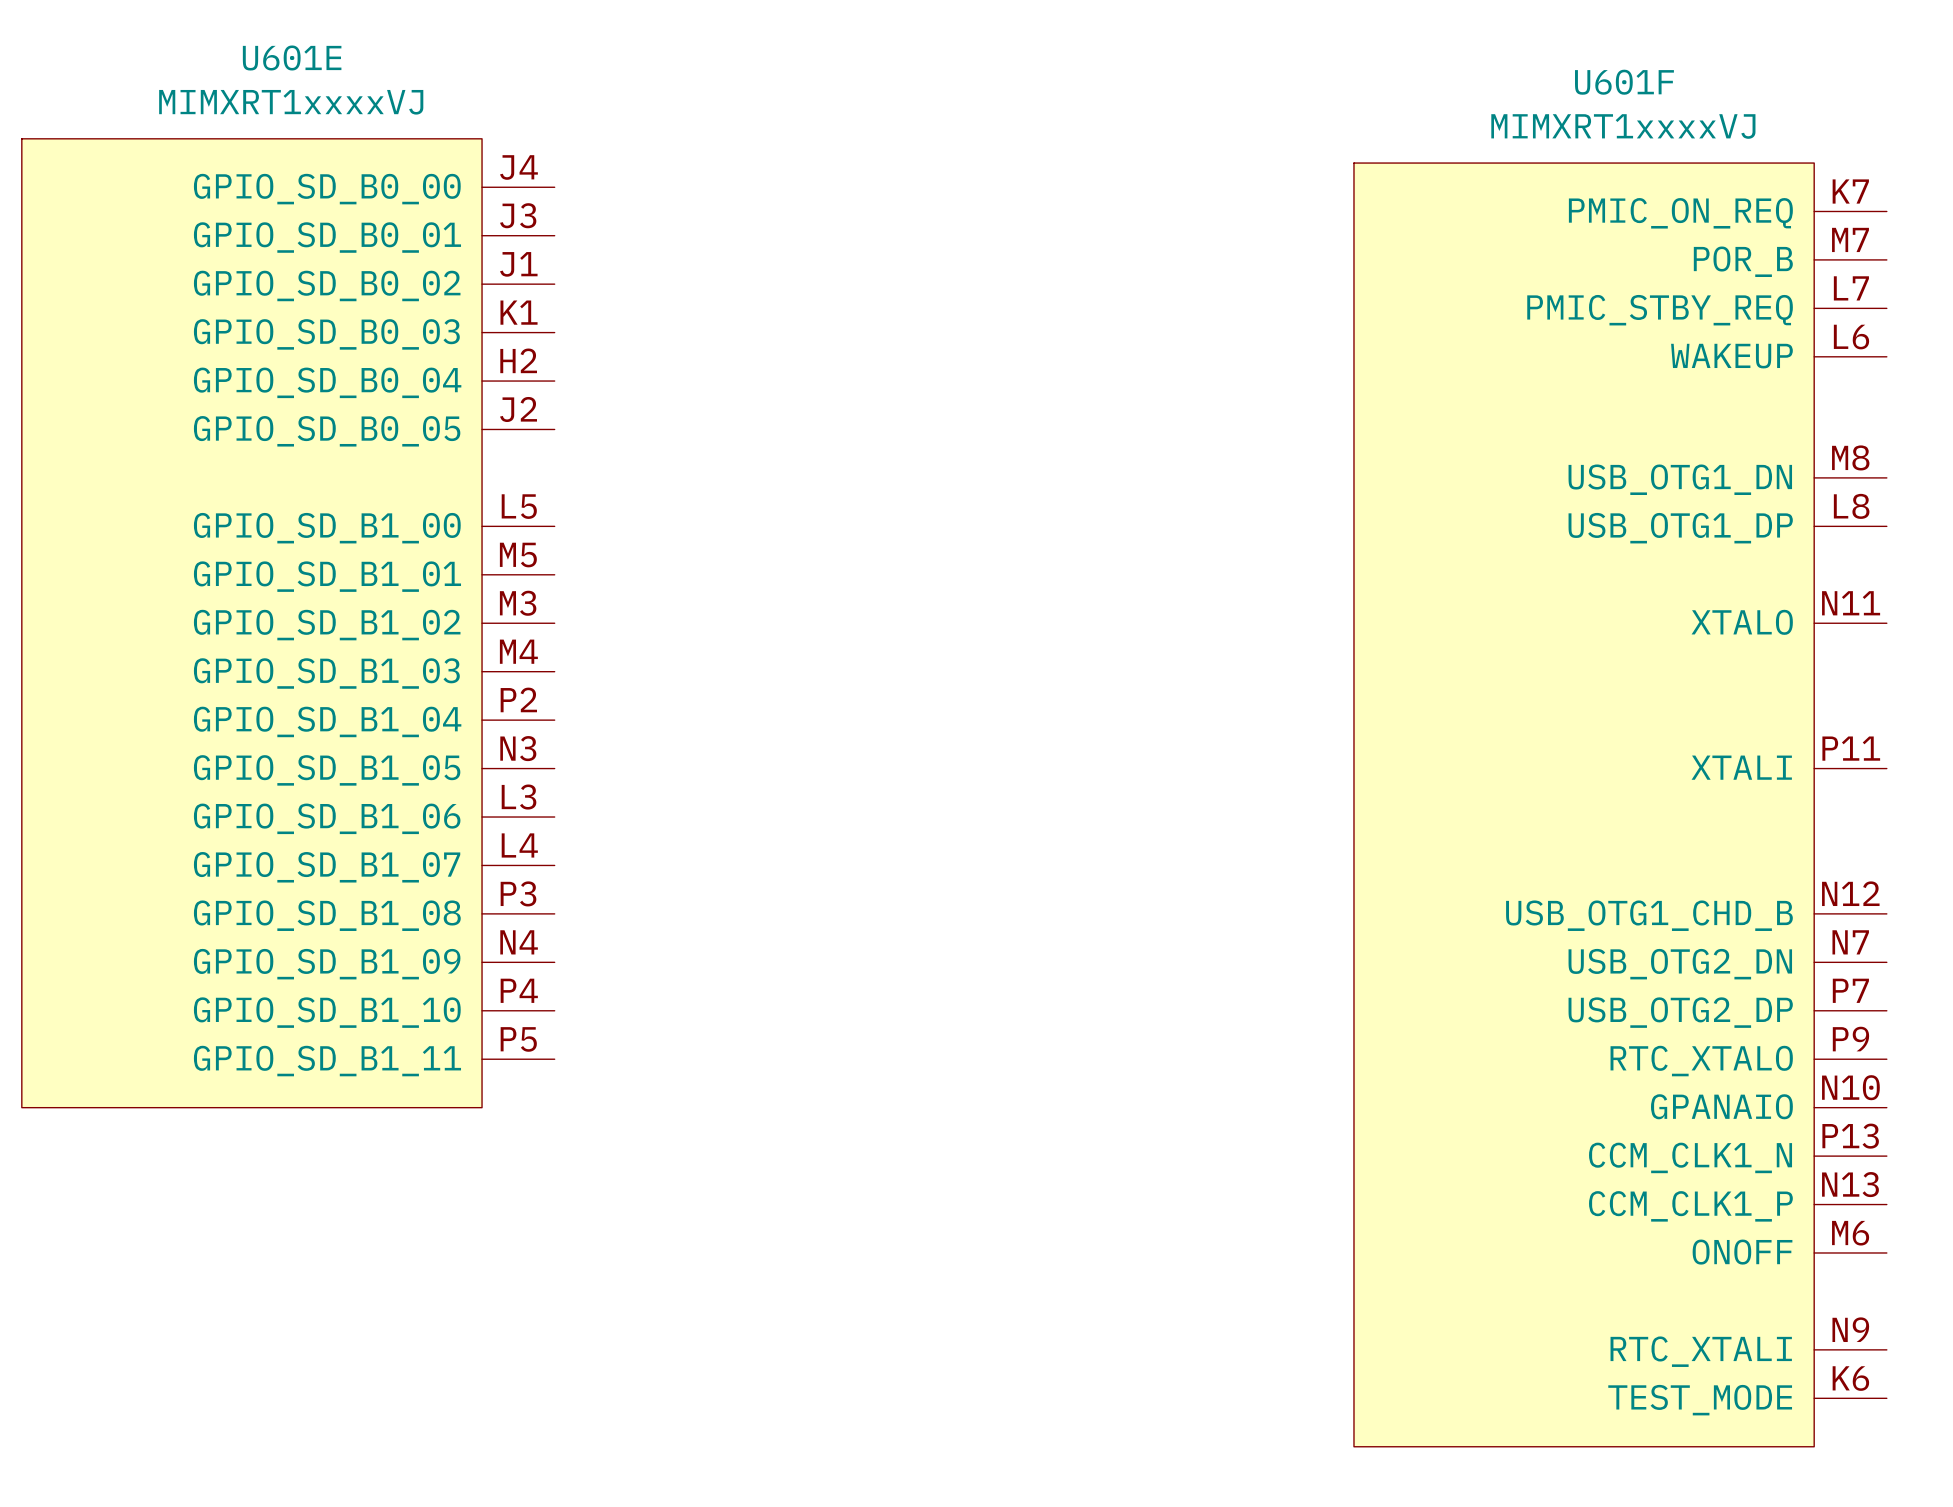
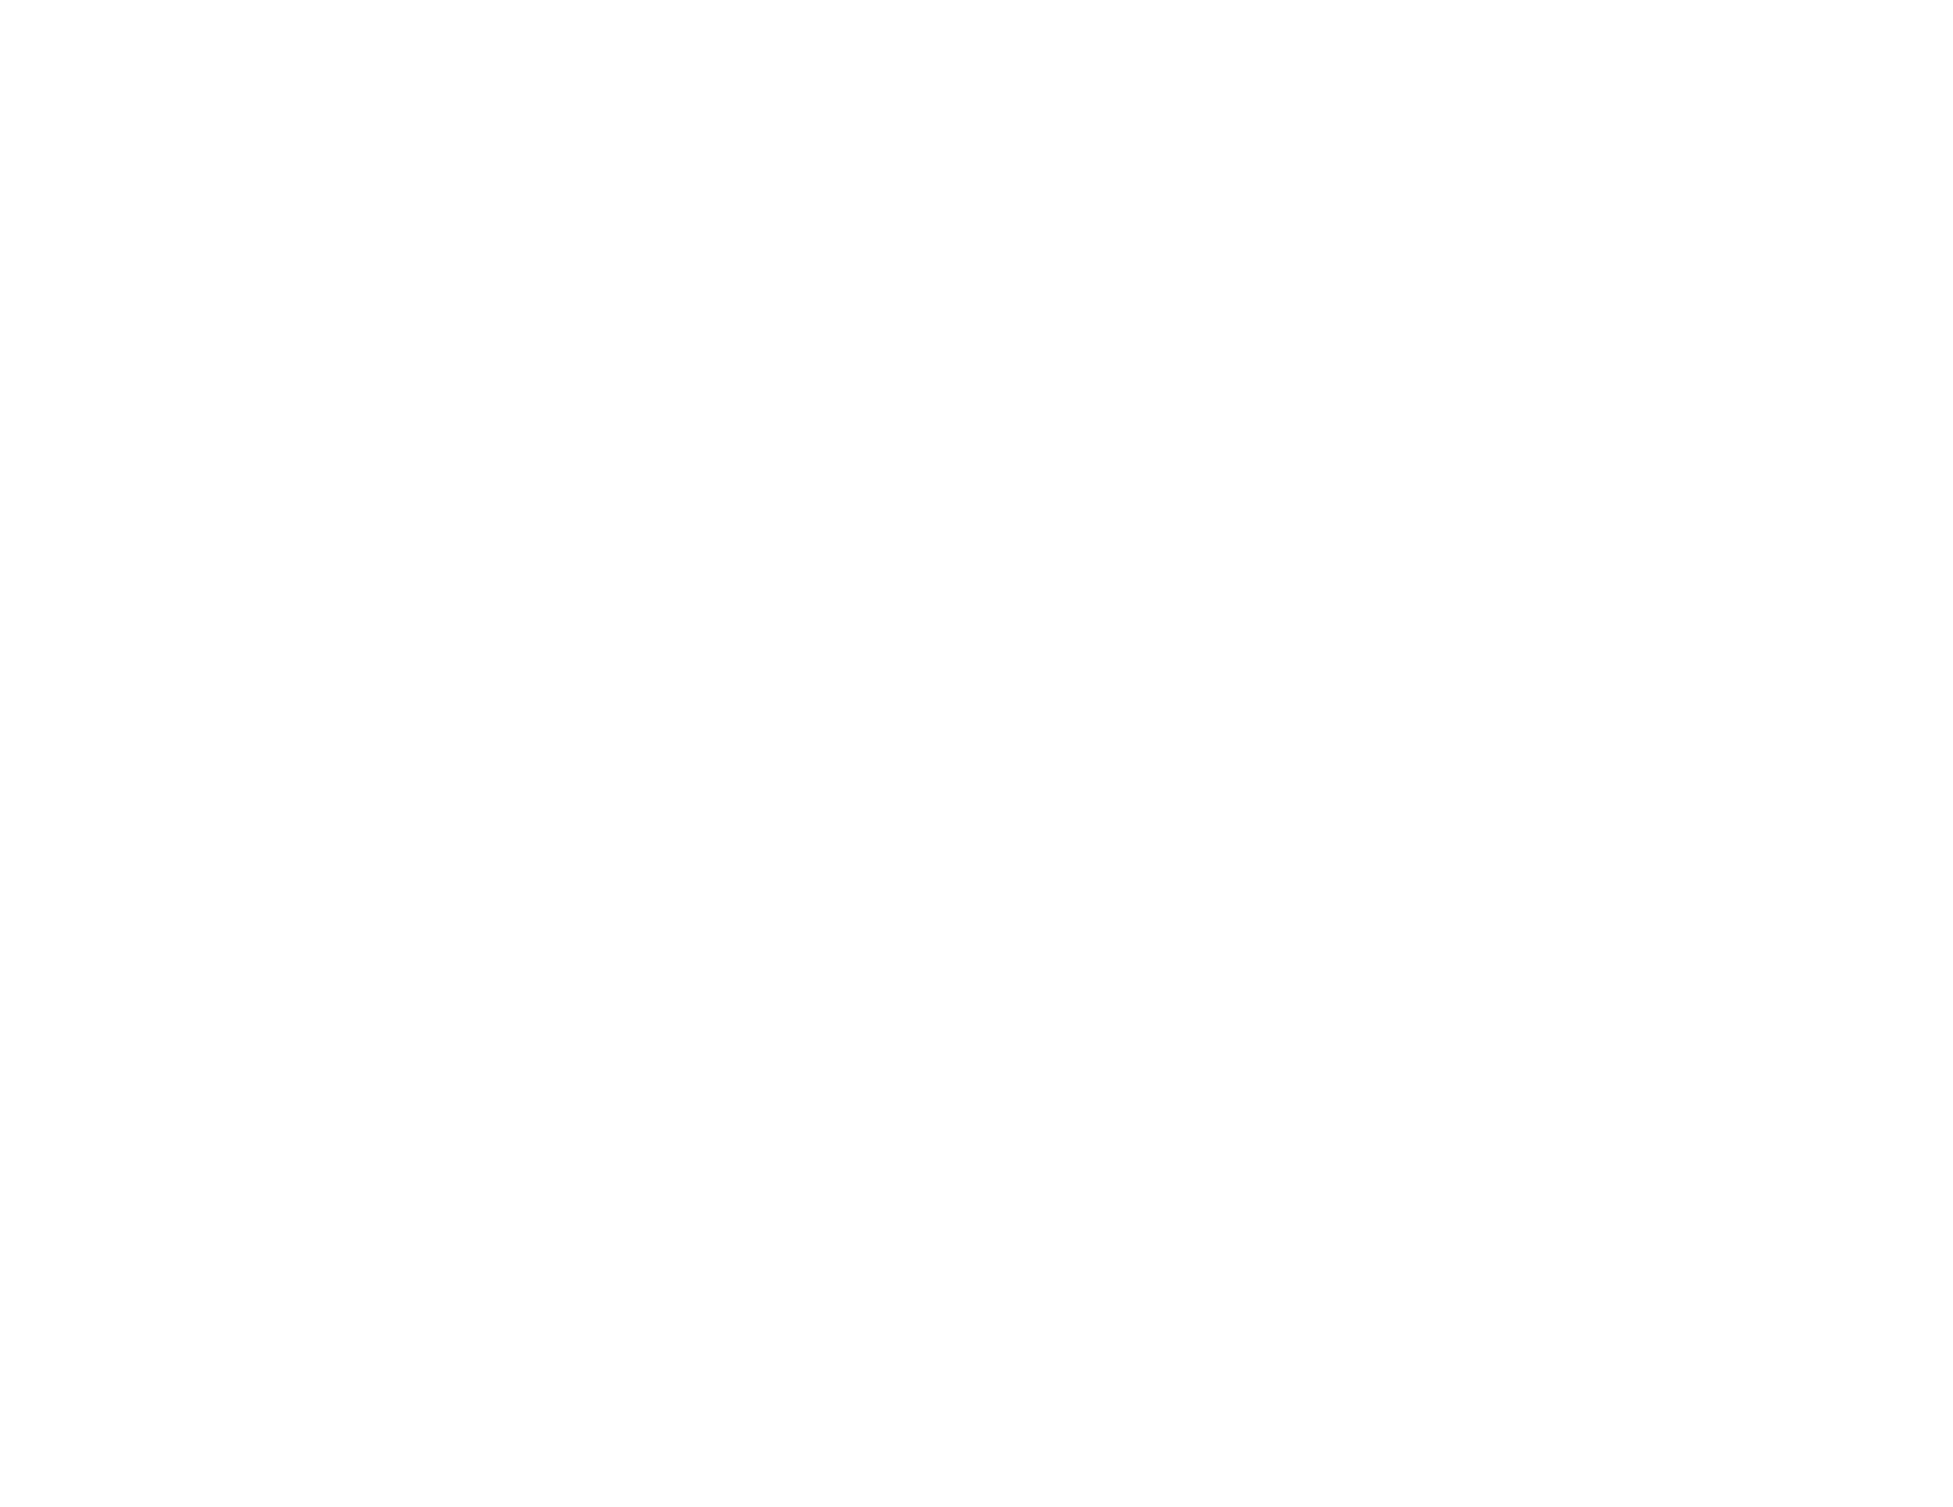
U601E: MIMXRT1xxxxVJ (288, 623) -> none
U601F: MIMXRT1xxxxVJ (1620, 804) -> none

